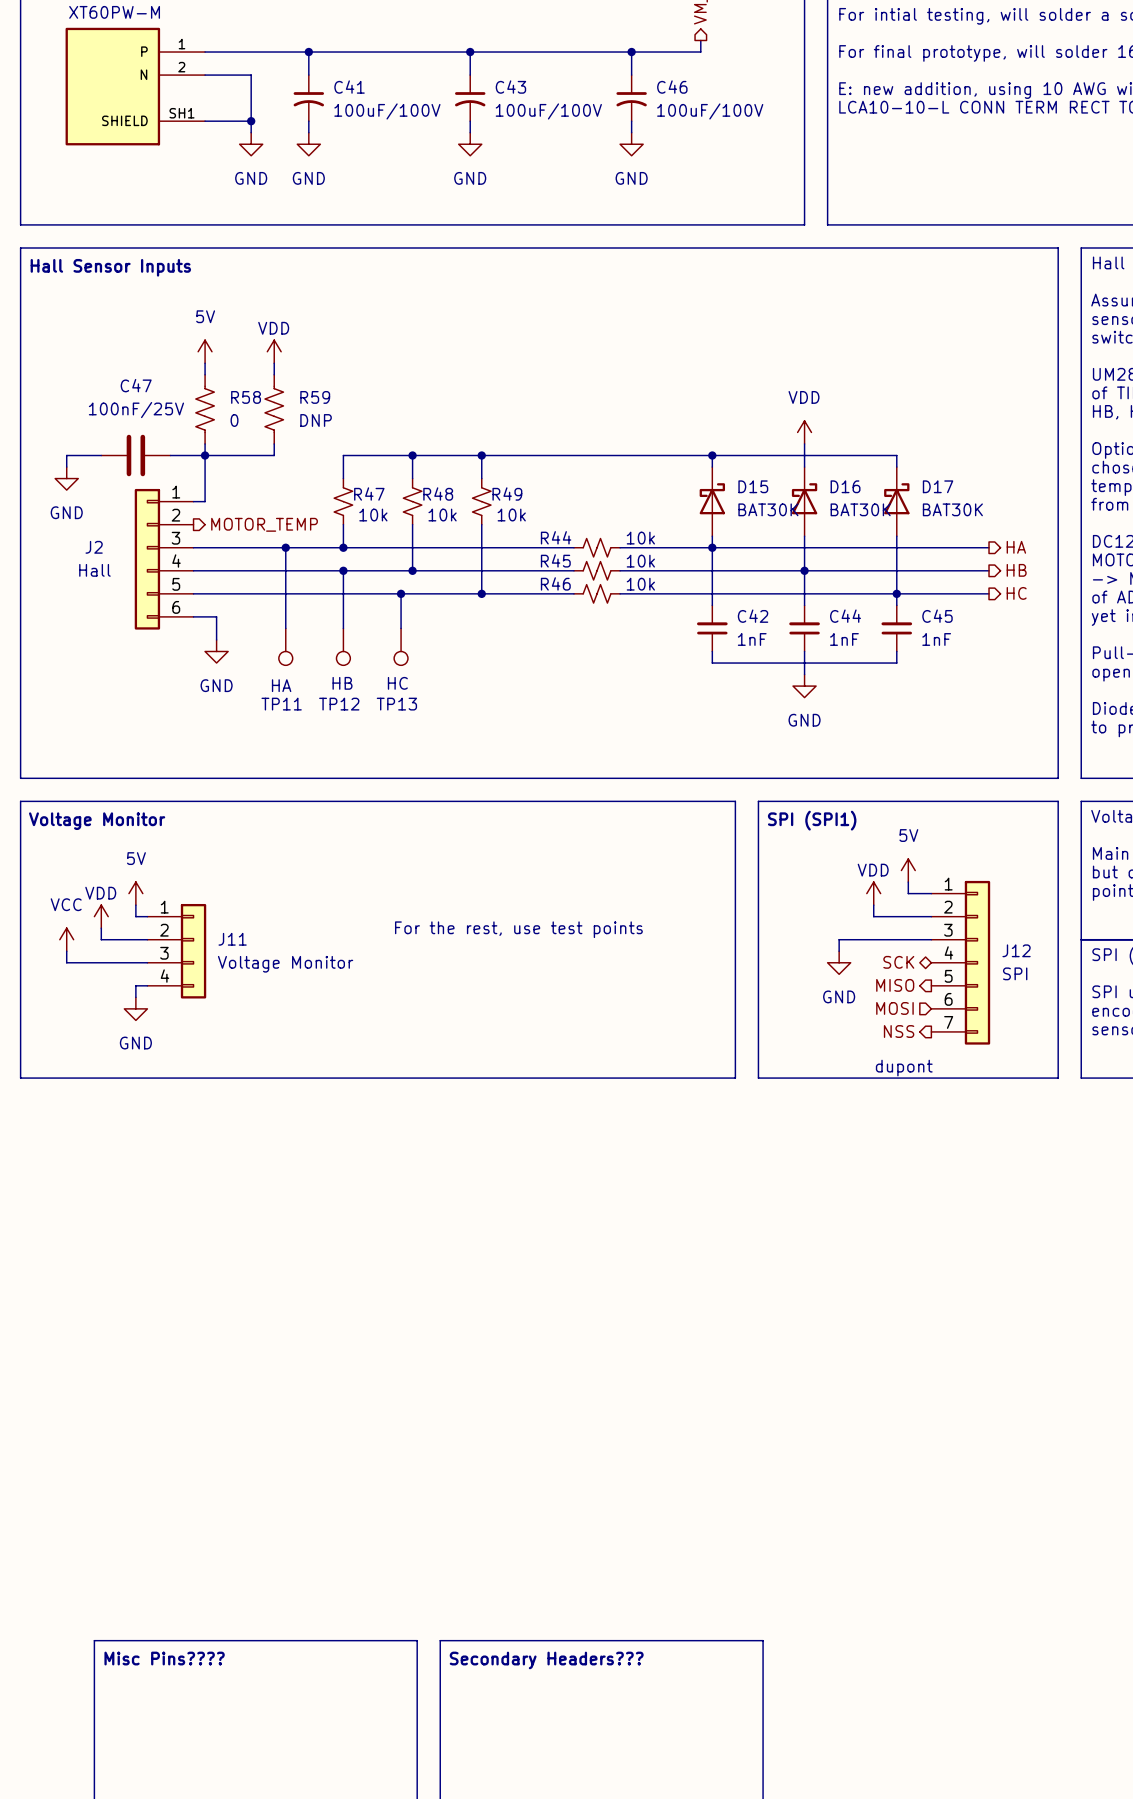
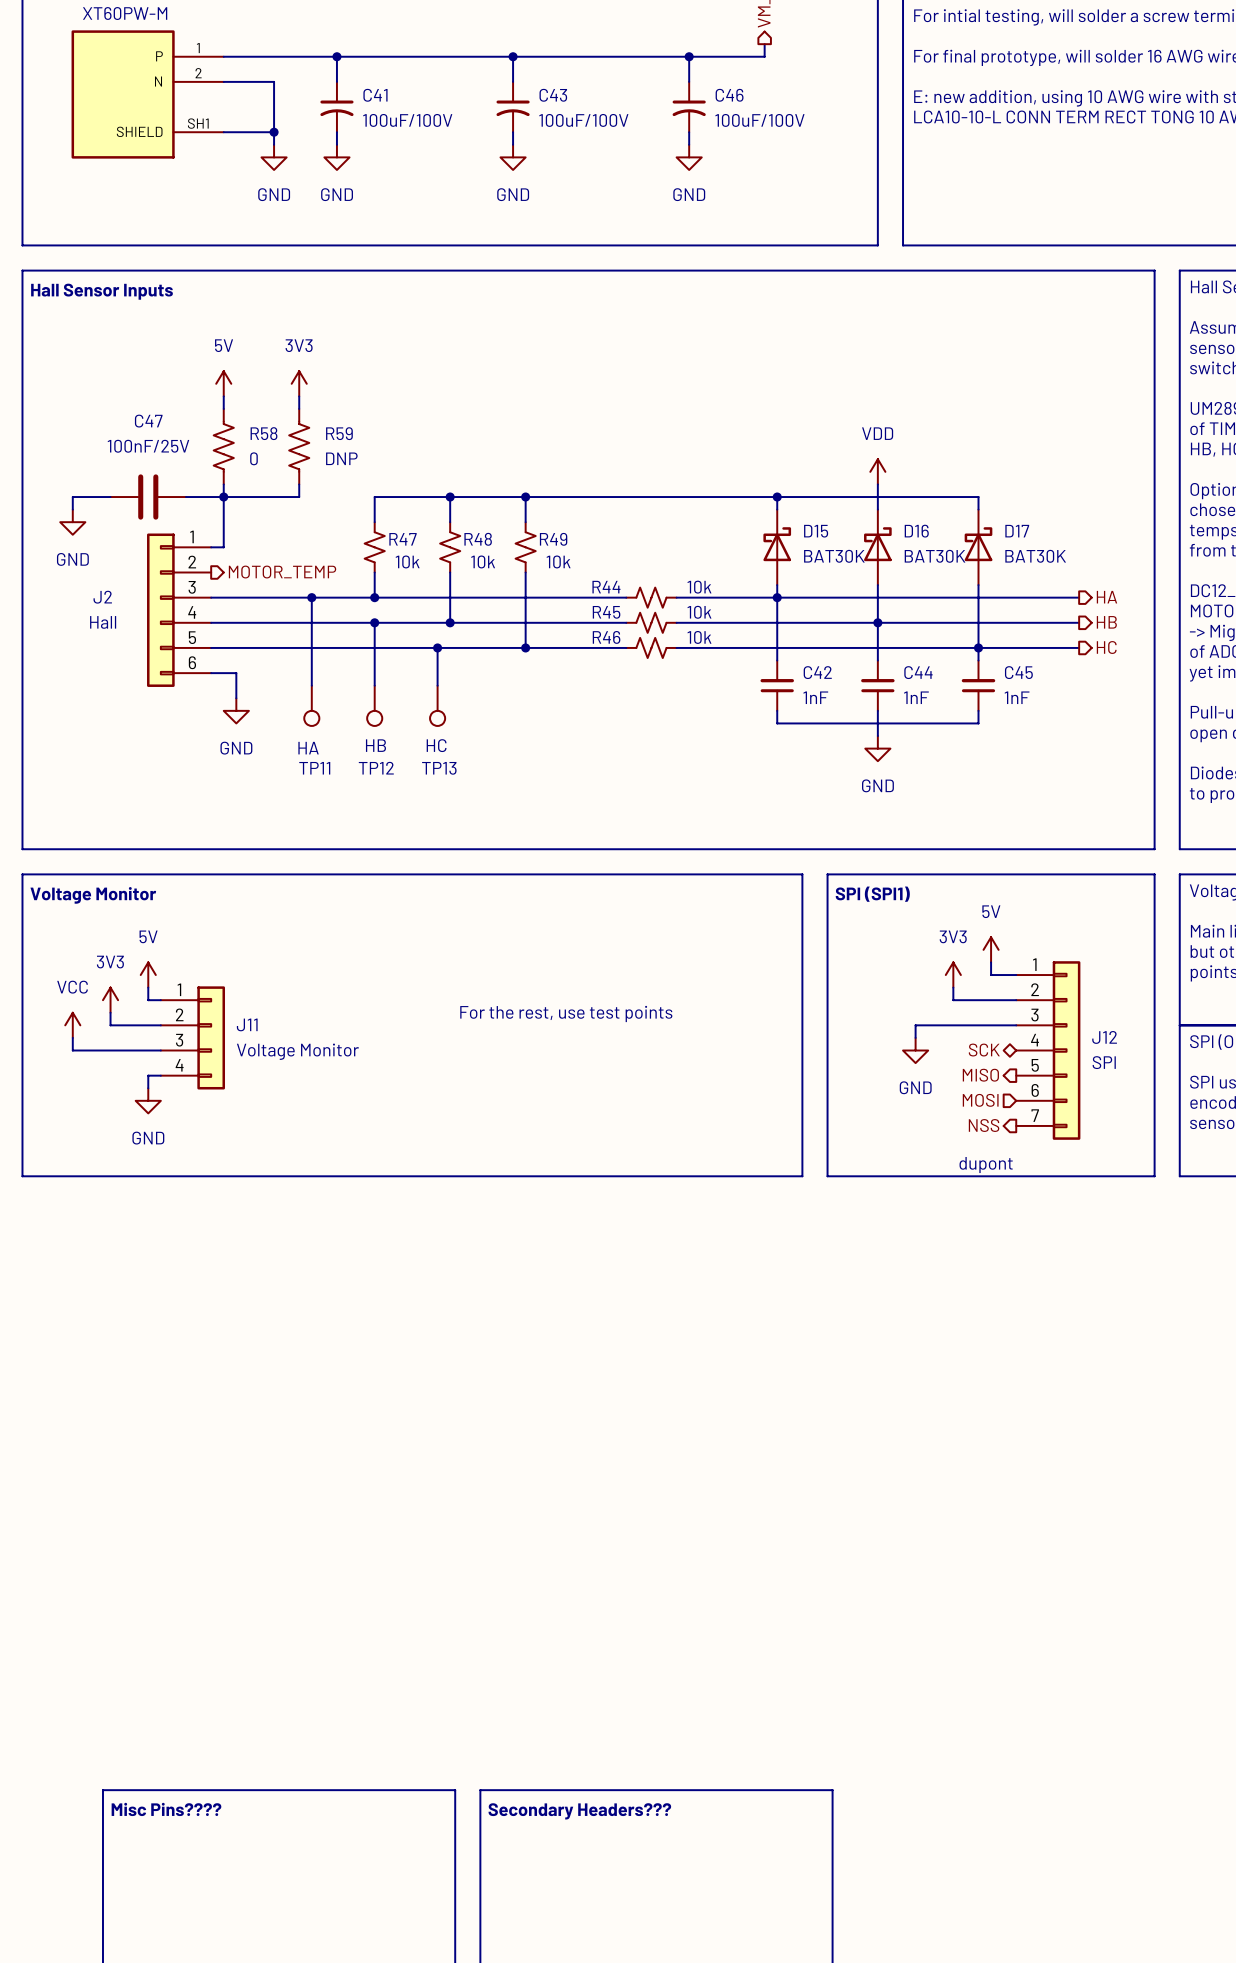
power symbol: VDD (274, 351) -> 3V3 (299, 383)
power symbol: VDD (873, 893) -> 3V3 (953, 975)
power symbol: VDD (101, 916) -> 3V3 (110, 1000)

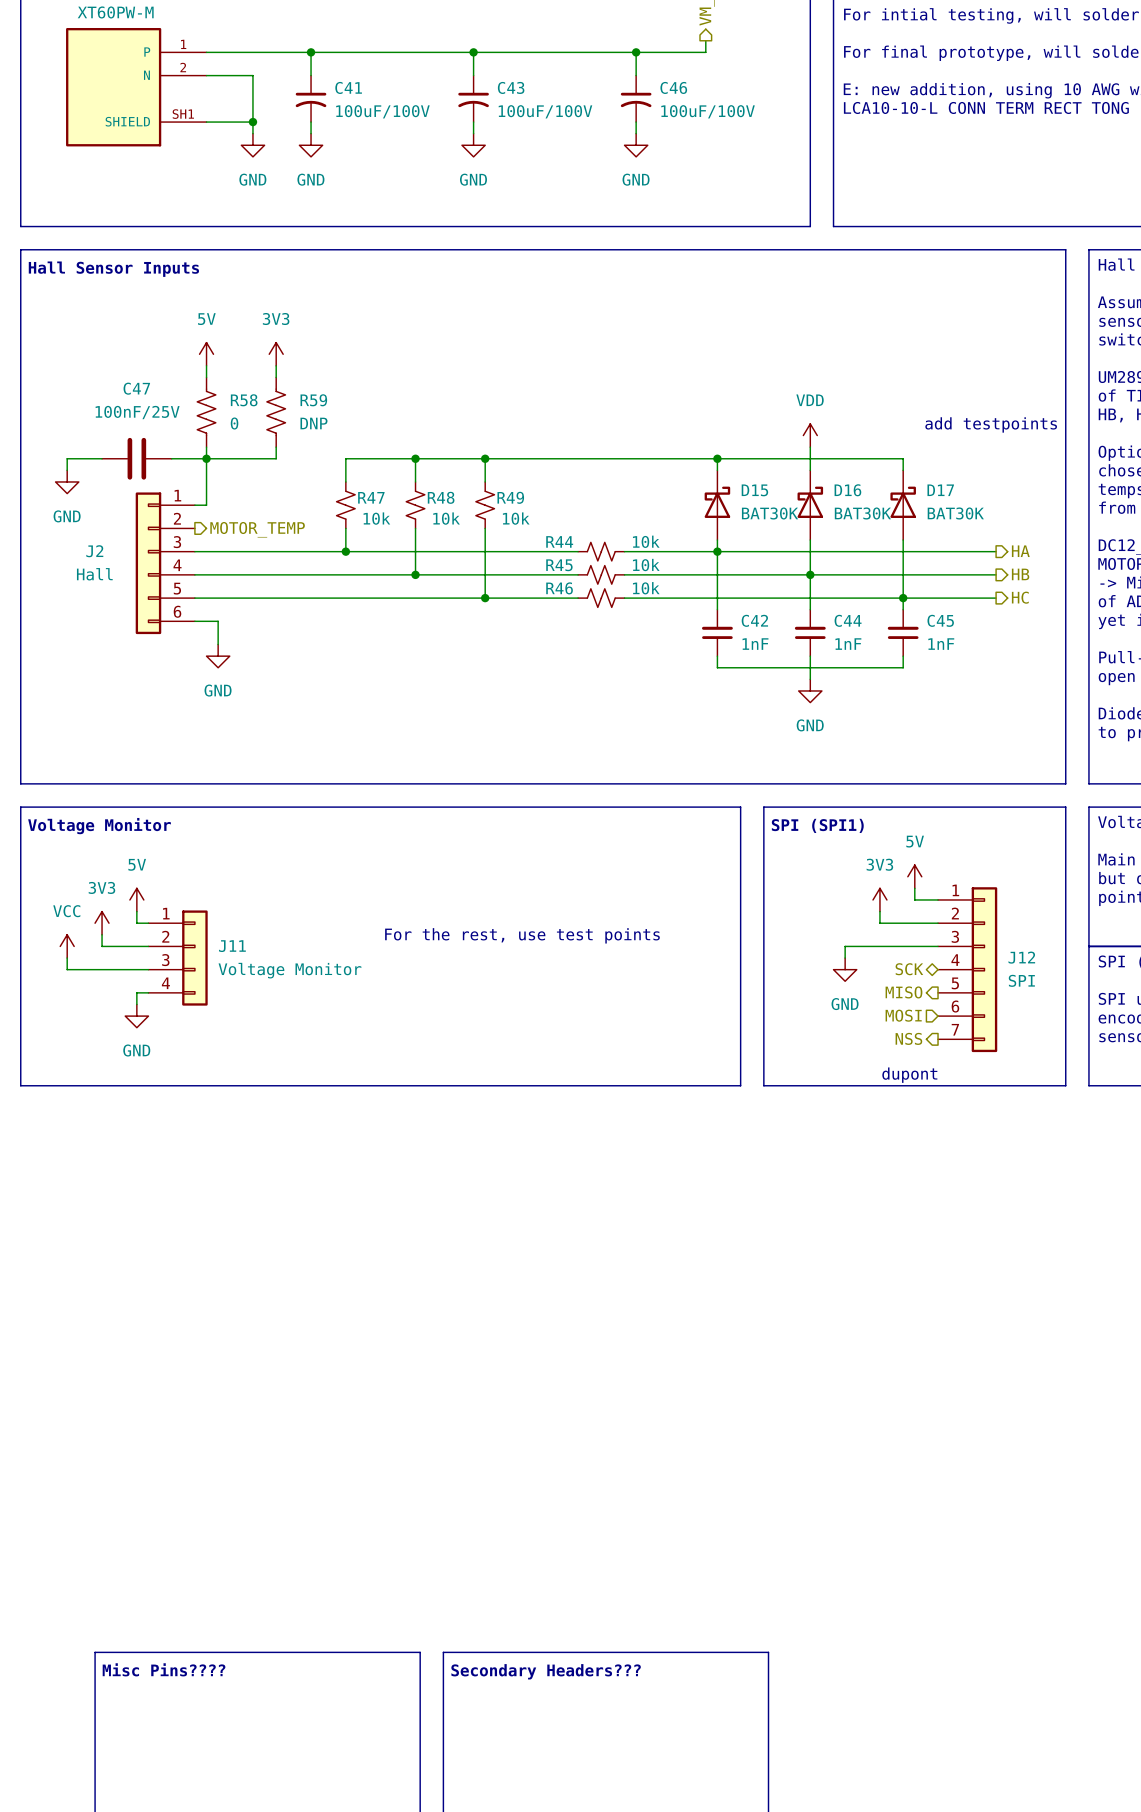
text: none -> add testpoints (991, 424)
wire: (311, 597) (311, 685) -> none
junction: (311, 597) -> none
wire: (374, 622) (374, 685) -> none
junction: (374, 622) -> none
wire: (437, 647) (437, 685) -> none
junction: (437, 647) -> none
TP11: HA (311, 705) -> none
TP12: HB (374, 705) -> none
TP13: HC (437, 705) -> none

